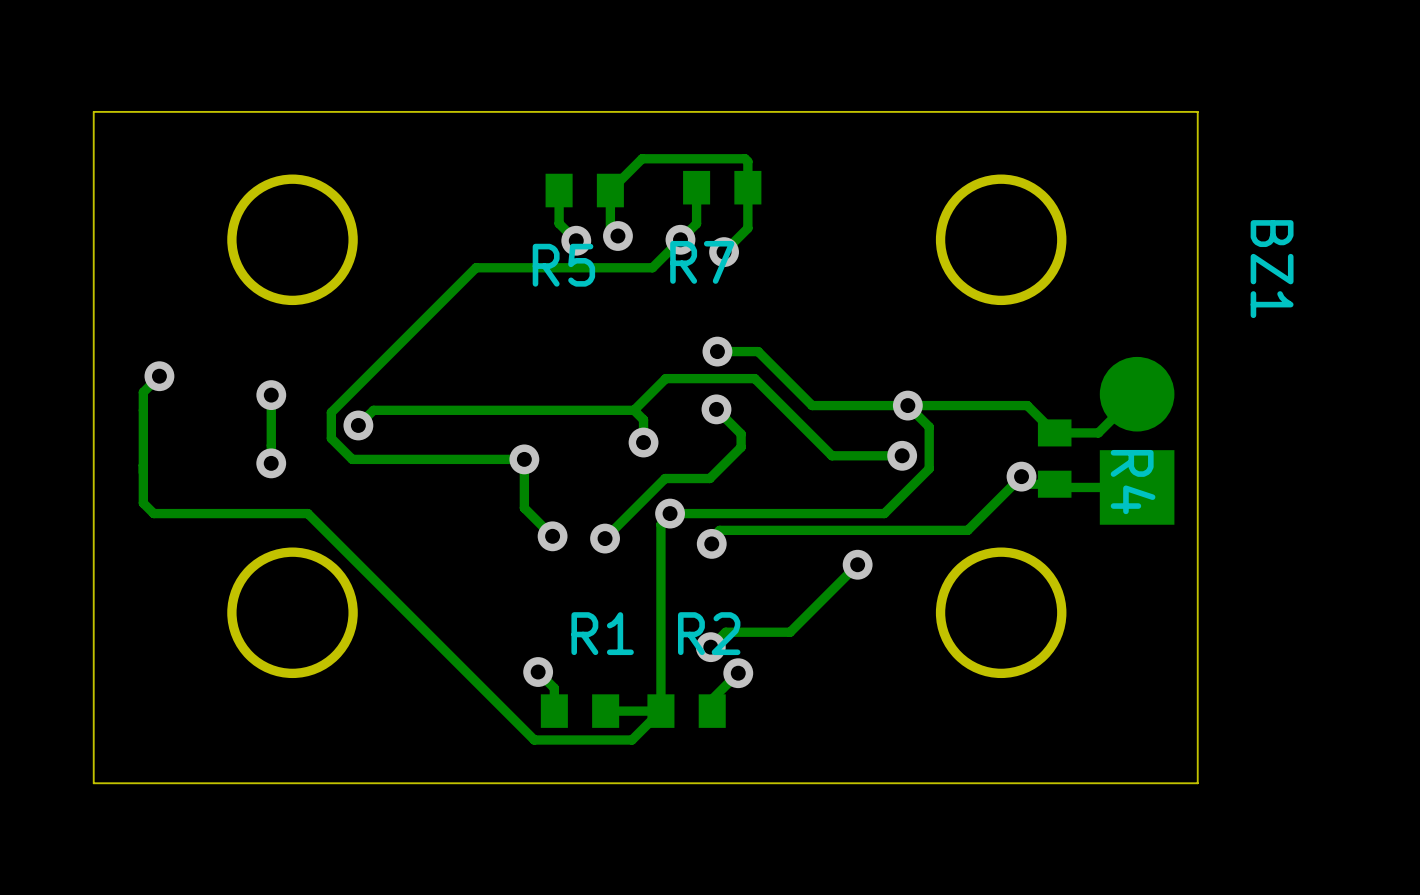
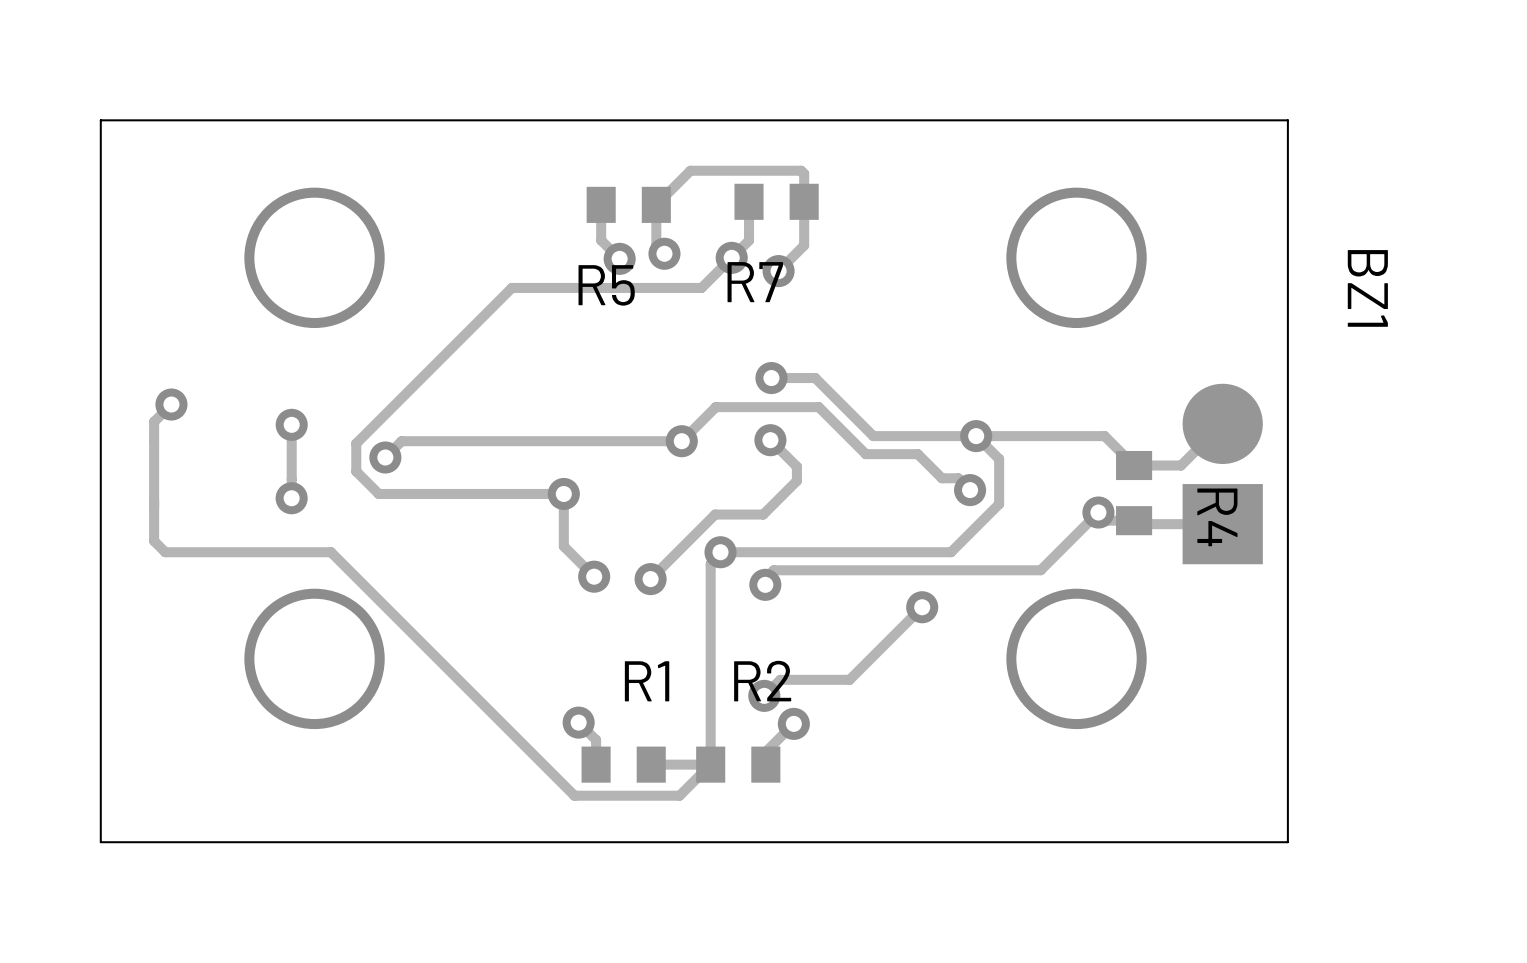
track: (754, 378) (831, 455) (902, 455) -> (811, 407) (818, 407) (865, 454) (917, 454) (941, 478) (958, 478) (970, 490)
track: (634, 410) (643, 419) (643, 442) -> none
via position: (643, 442) -> (681, 441)

